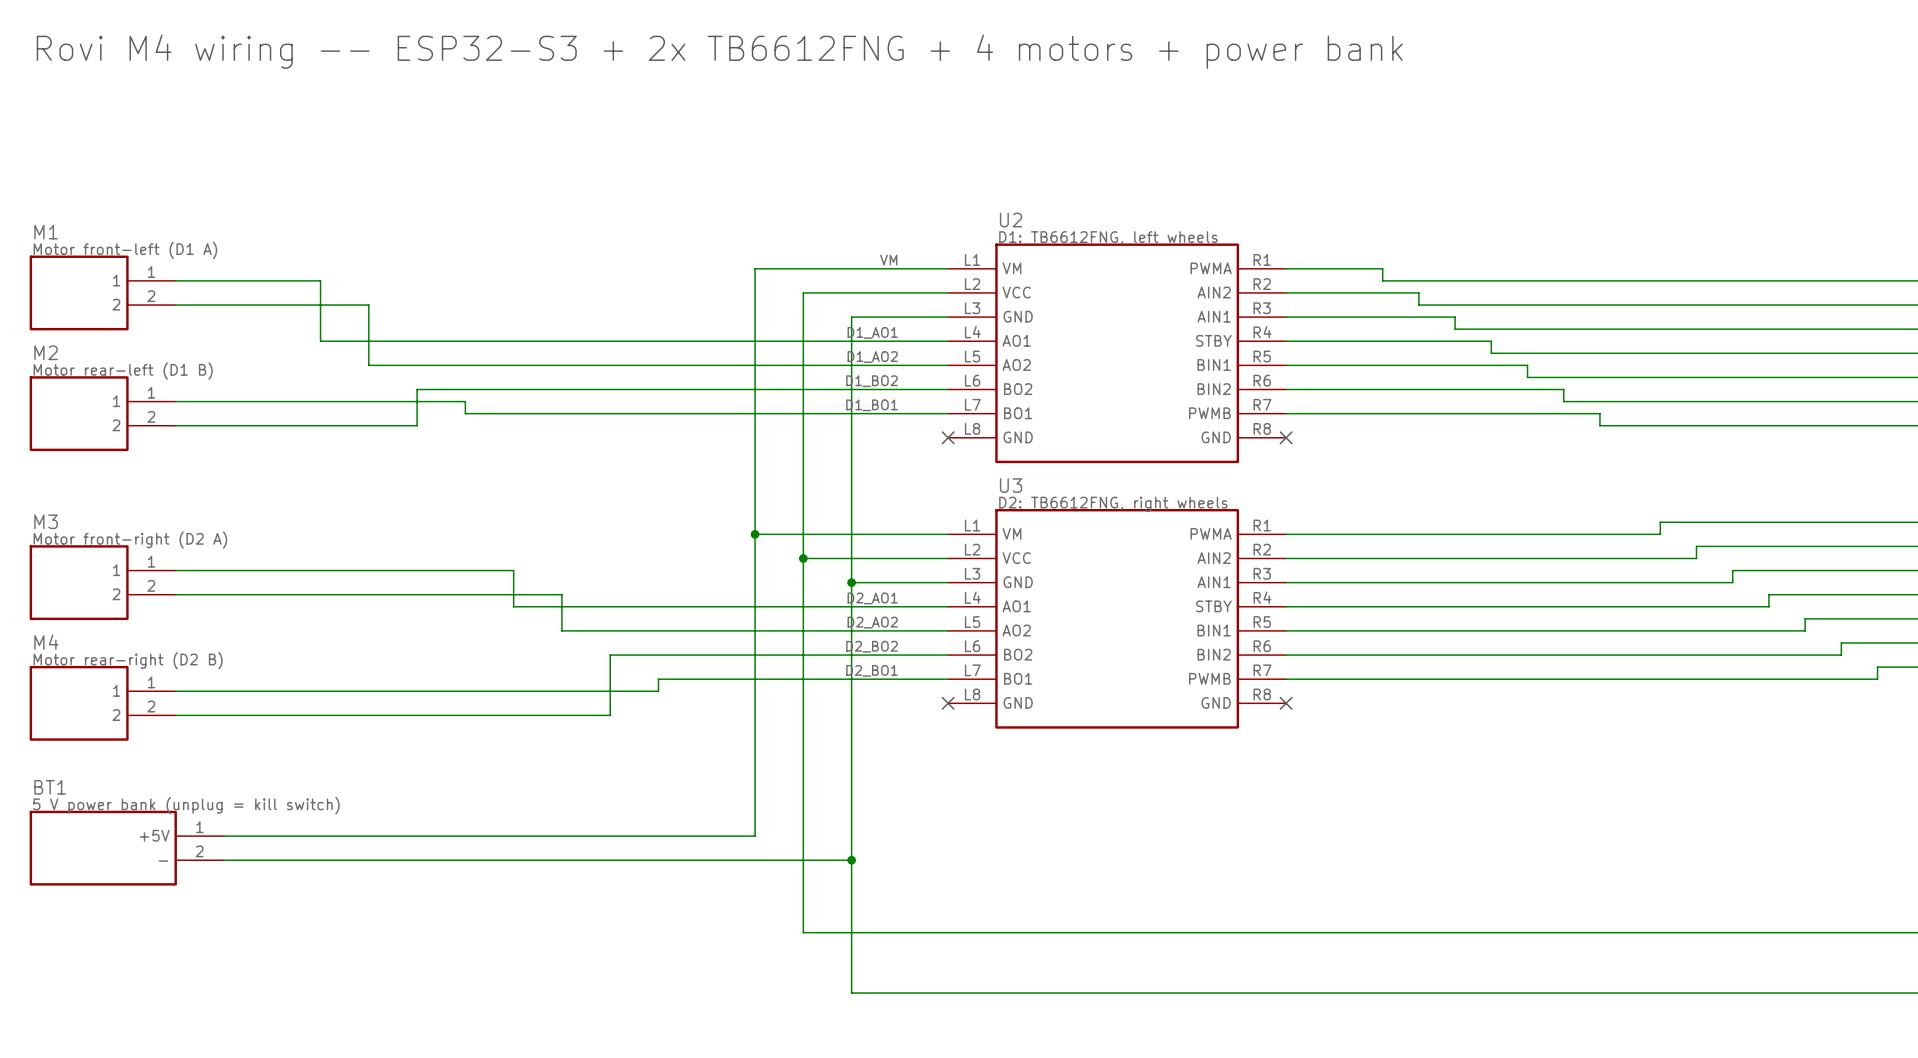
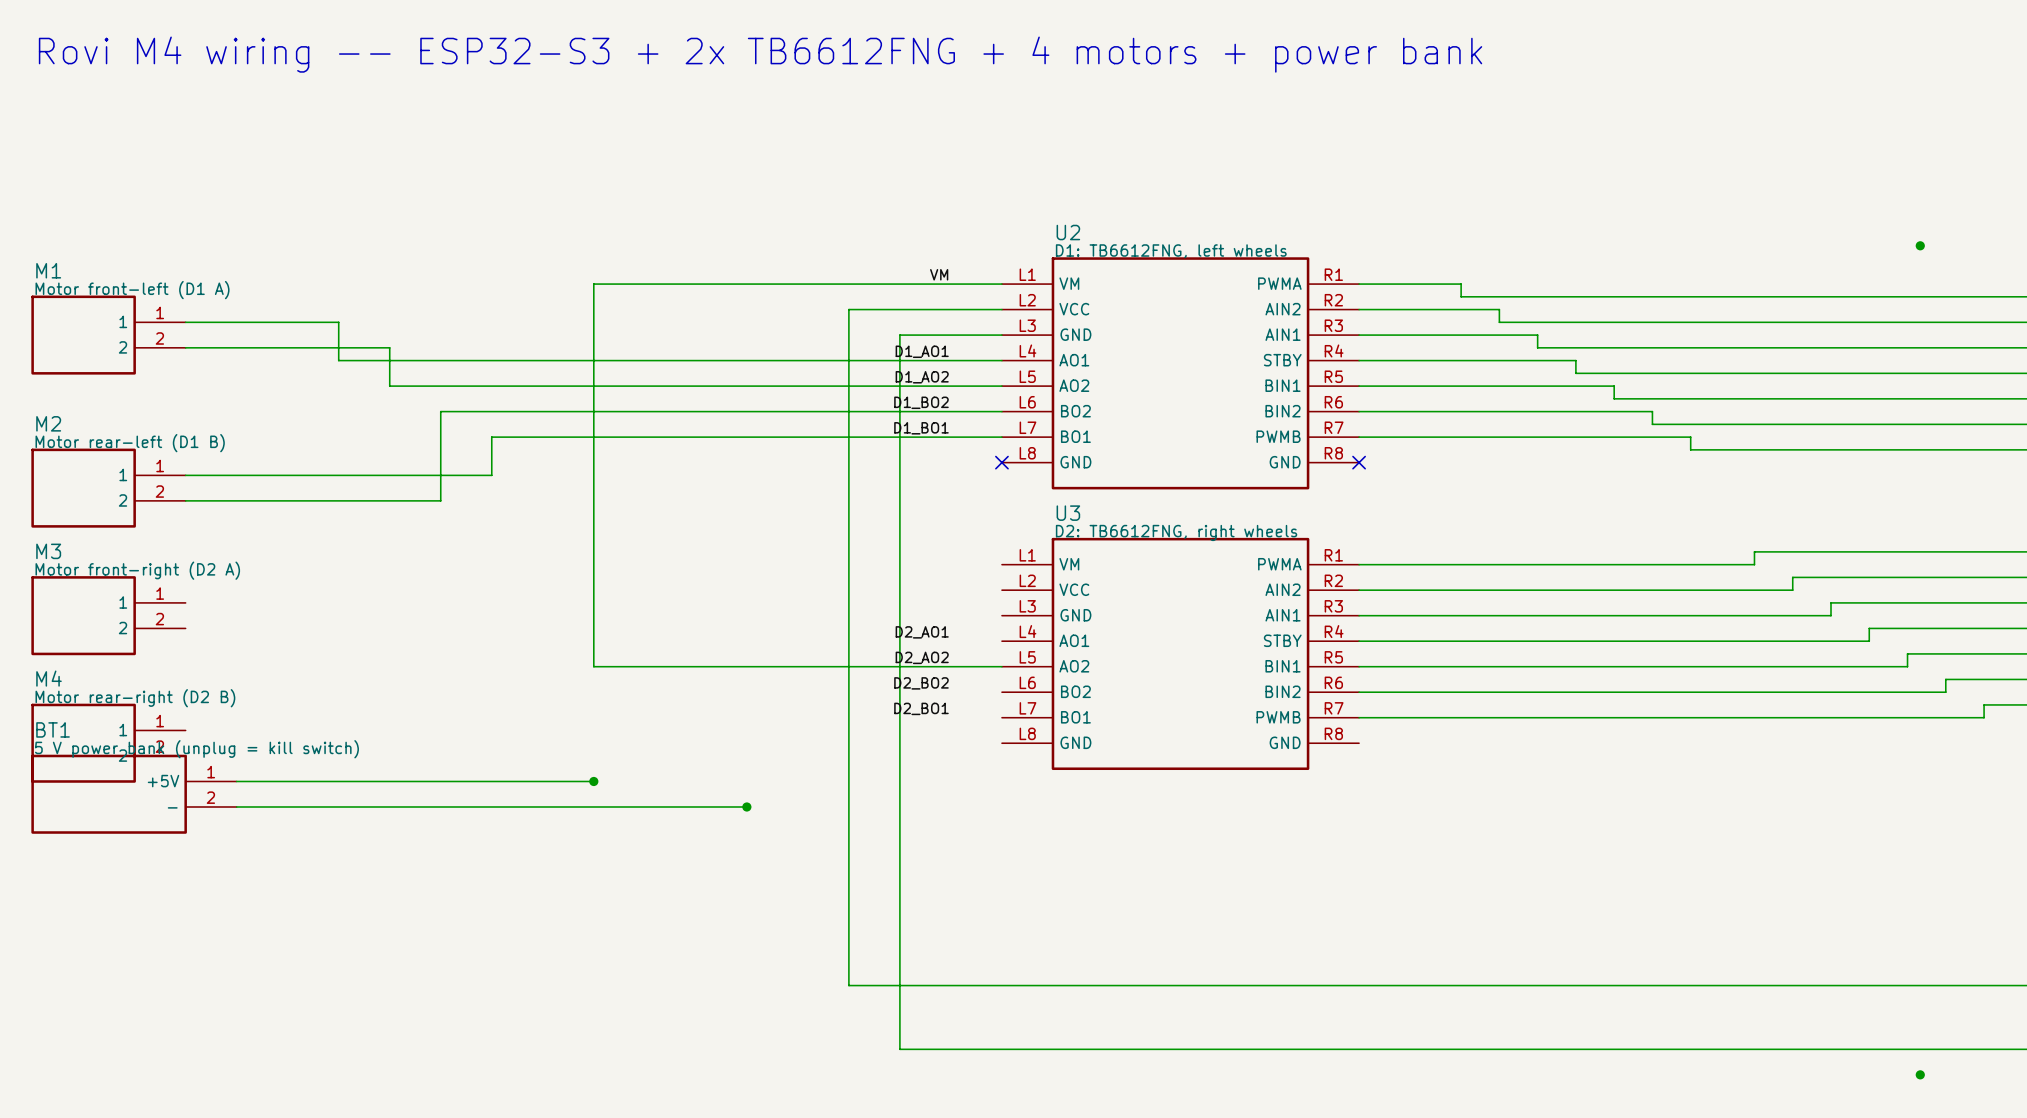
junction: none -> (1920, 245)
wire: (755, 268) (755, 836) (223, 836) -> (797, 284) (593, 284) (593, 628)
wire: (175, 280) (320, 280) (320, 305) (368, 305) (368, 329) -> (185, 347) (389, 347)
M1 position: (102, 292) -> (108, 335)
wire: (175, 401) (465, 401) (465, 413) -> (185, 475) (491, 475) (491, 437)
M2 position: (102, 413) -> (108, 488)
wire: (175, 425) (417, 425) -> (185, 500) (440, 500) (440, 449)
wire: (755, 534) (948, 534) -> none
junction: (755, 534) -> none
wire: (803, 558) (948, 558) -> none
junction: (803, 558) -> none
wire: (175, 570) (513, 570) (513, 606) (948, 606) -> none
wire: (851, 582) (948, 582) -> none
junction: (851, 582) -> none
wire: (175, 594) (561, 594) -> none
wire: (948, 655) (610, 655) (610, 715) (175, 715) -> none
wire: (948, 679) (658, 679) (658, 691) (175, 691) -> none
no-connect mark: (948, 703) -> none
no-connect mark: (1286, 703) -> none
wire: none -> (236, 781) (593, 781)
junction: none -> (593, 781)
wire: none -> (236, 806) (746, 806)
junction: none -> (746, 806)
BT1 position: (126, 848) -> (134, 794)
wire: (223, 860) (851, 860) -> none
junction: (851, 860) -> none
junction: none -> (1920, 1074)

